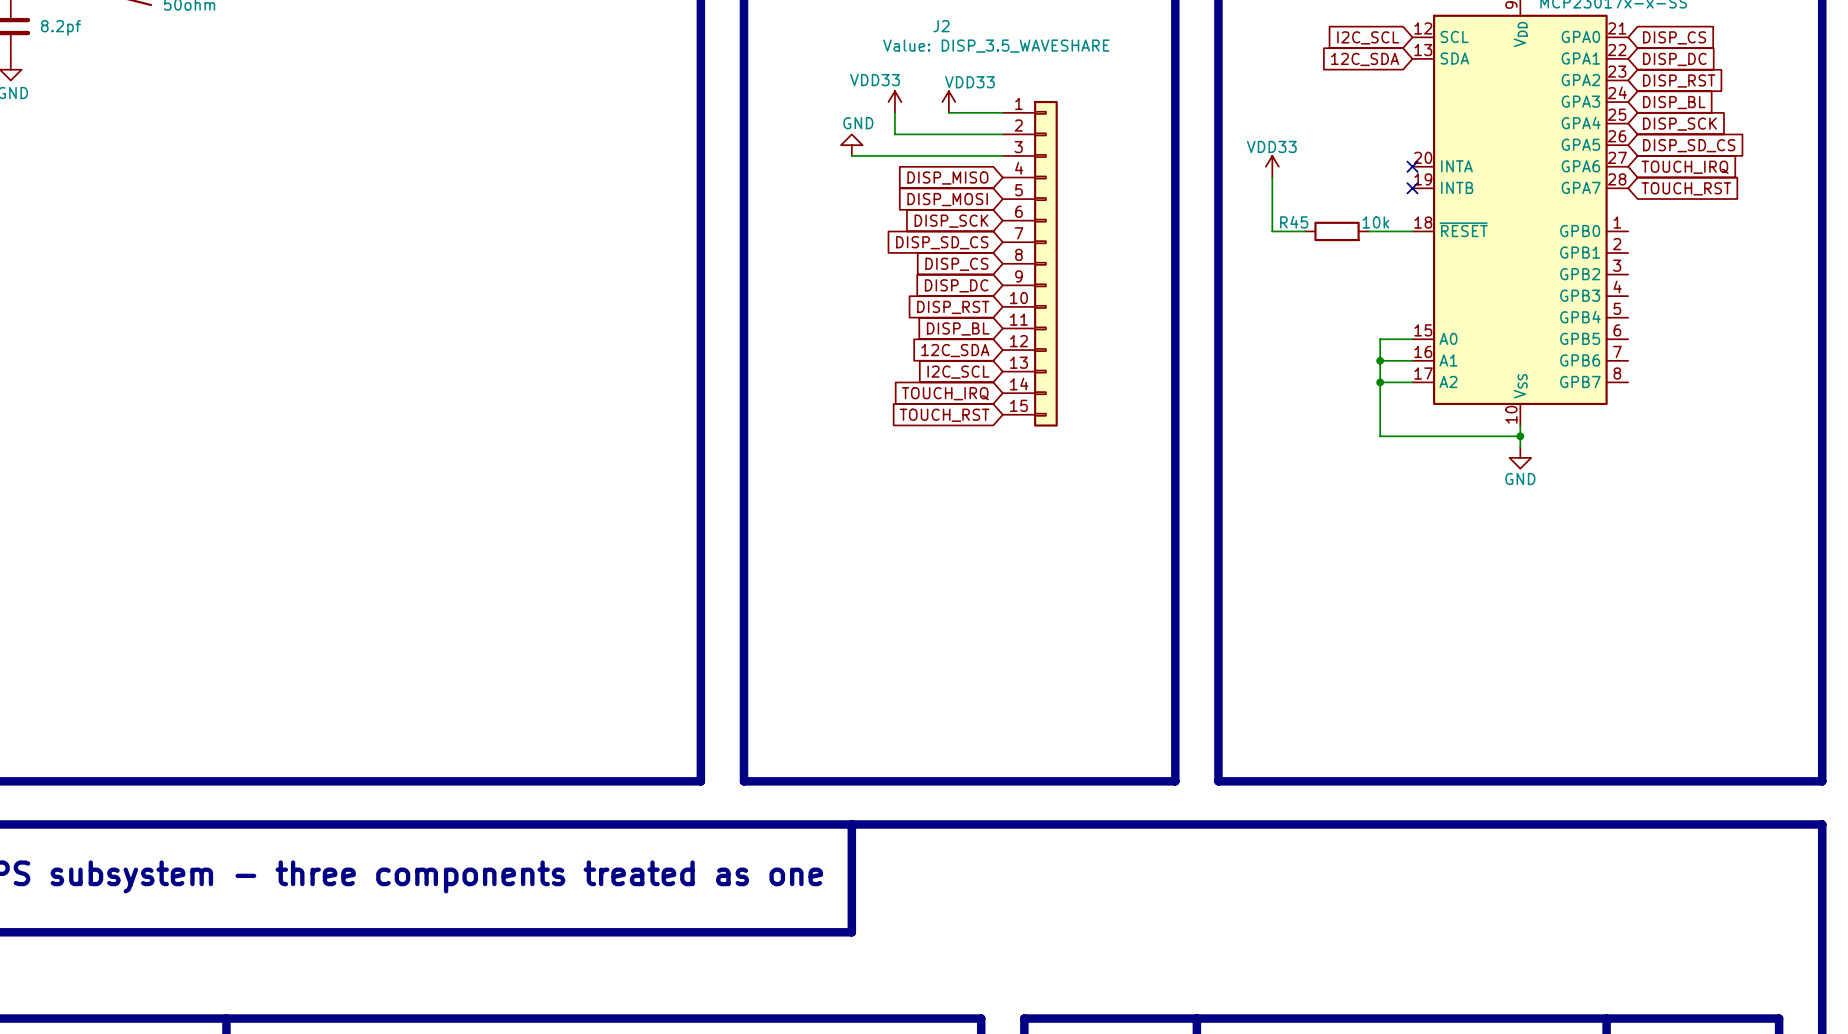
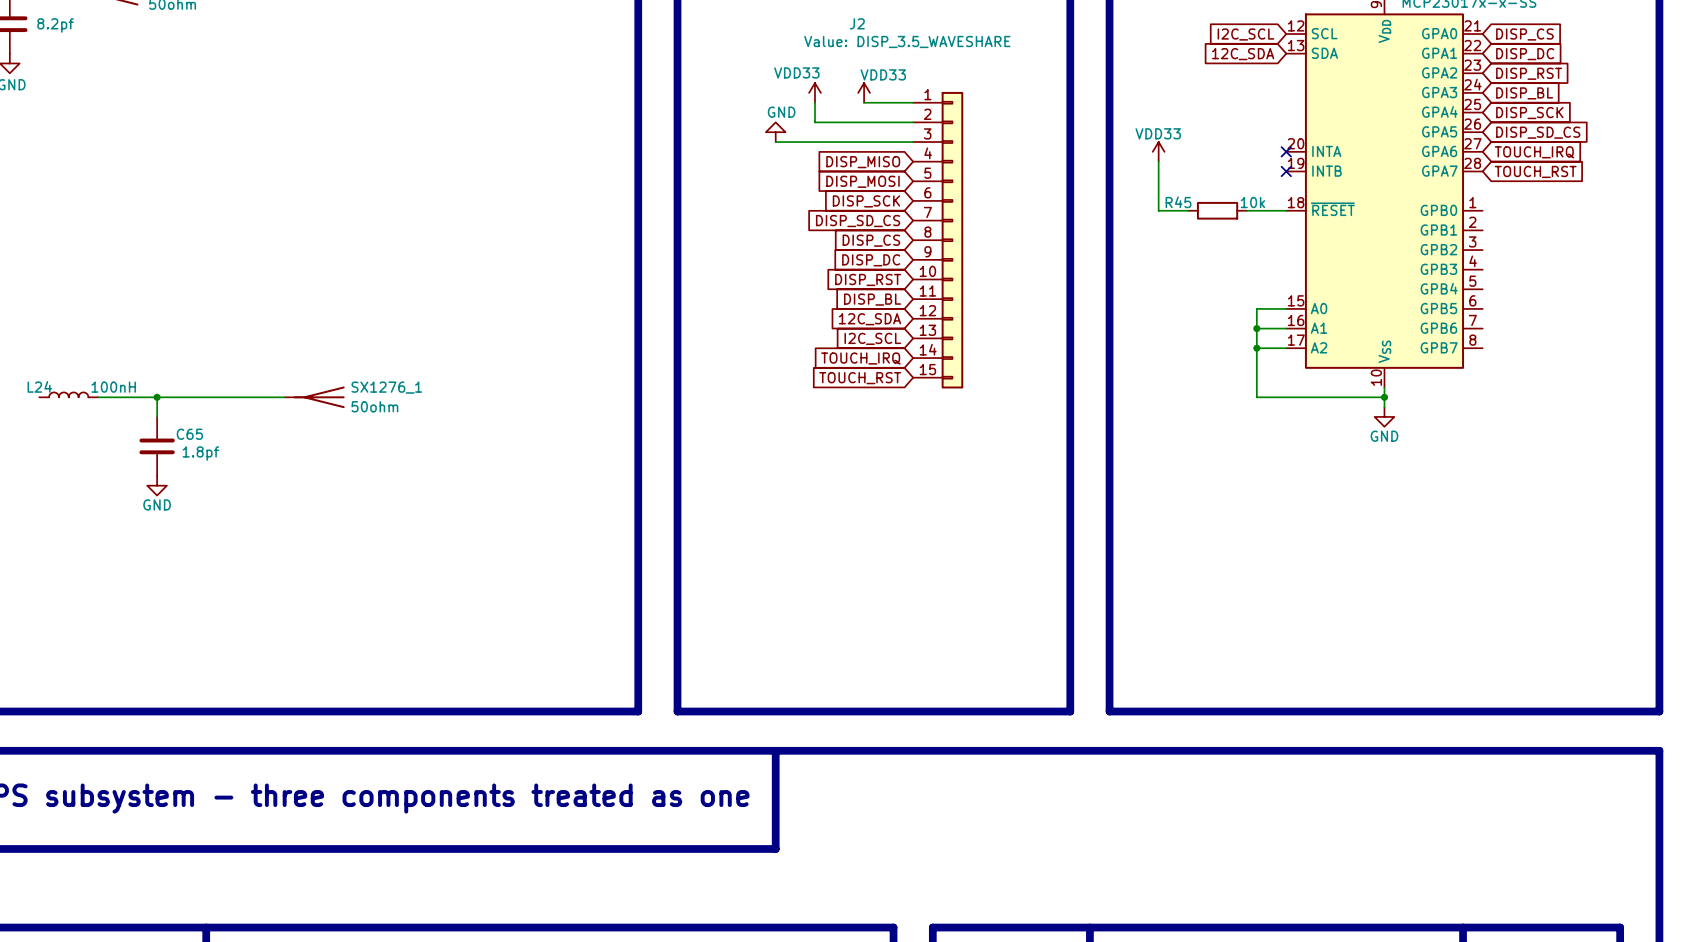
L24: none -> 100nH (68, 394)
wire: none -> (98, 397) (284, 397)
wire: none -> (157, 397) (157, 416)
junction: none -> (157, 397)
SX1276_1: none -> 50ohm (314, 397)
C65: none -> 1.8pf (157, 446)
power symbol: none -> GND (157, 485)

